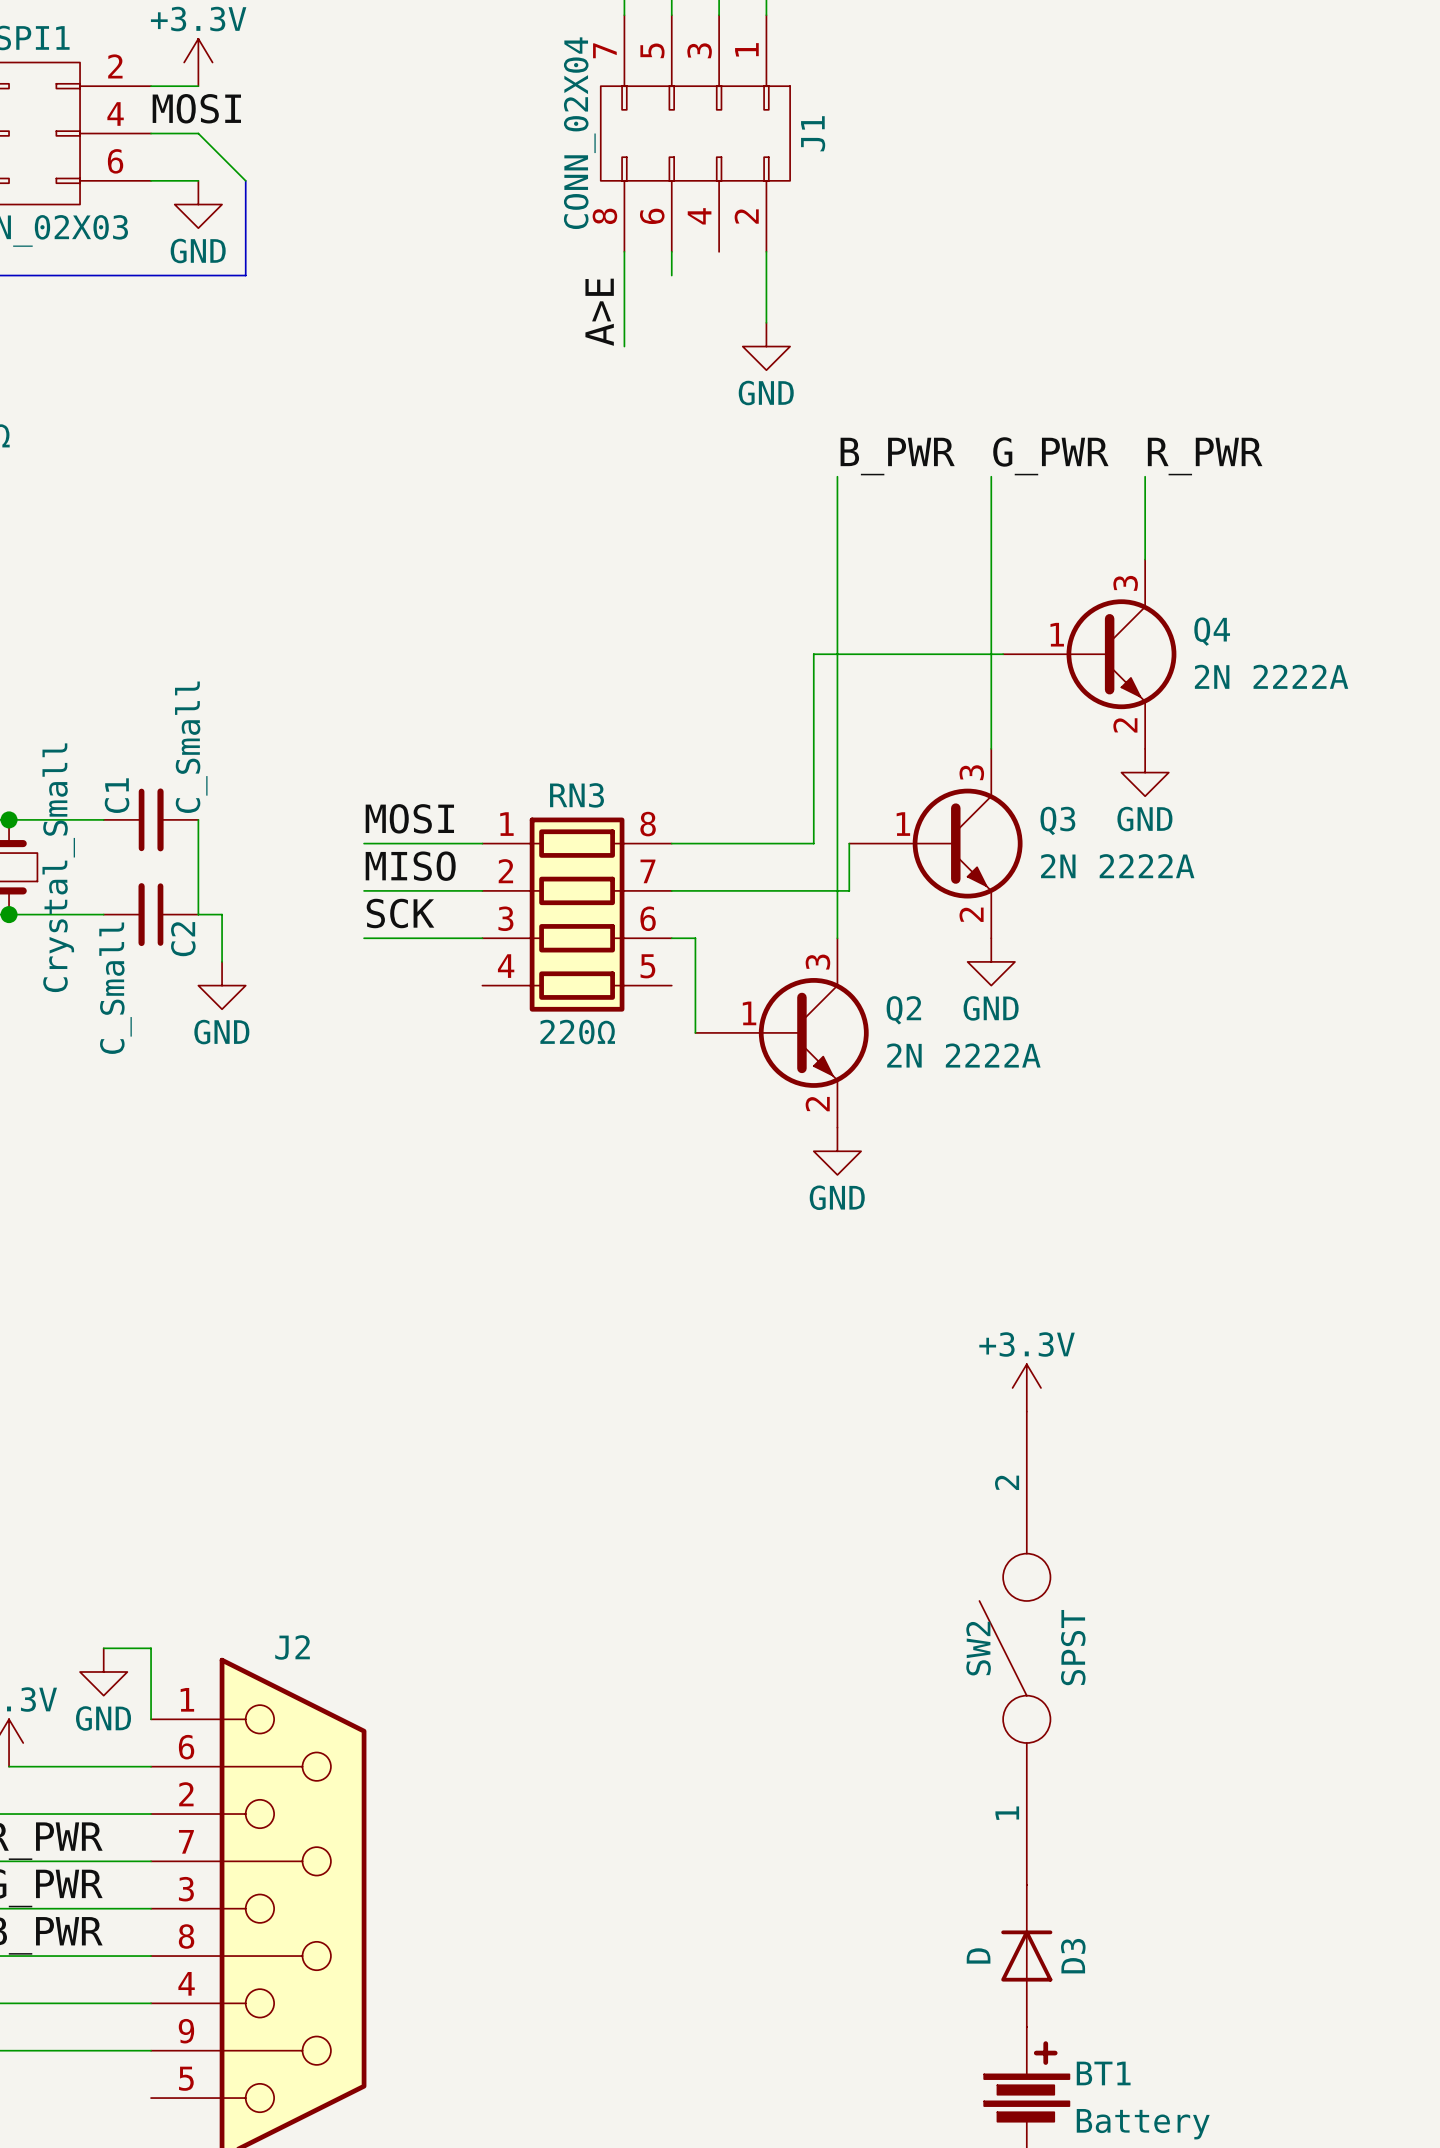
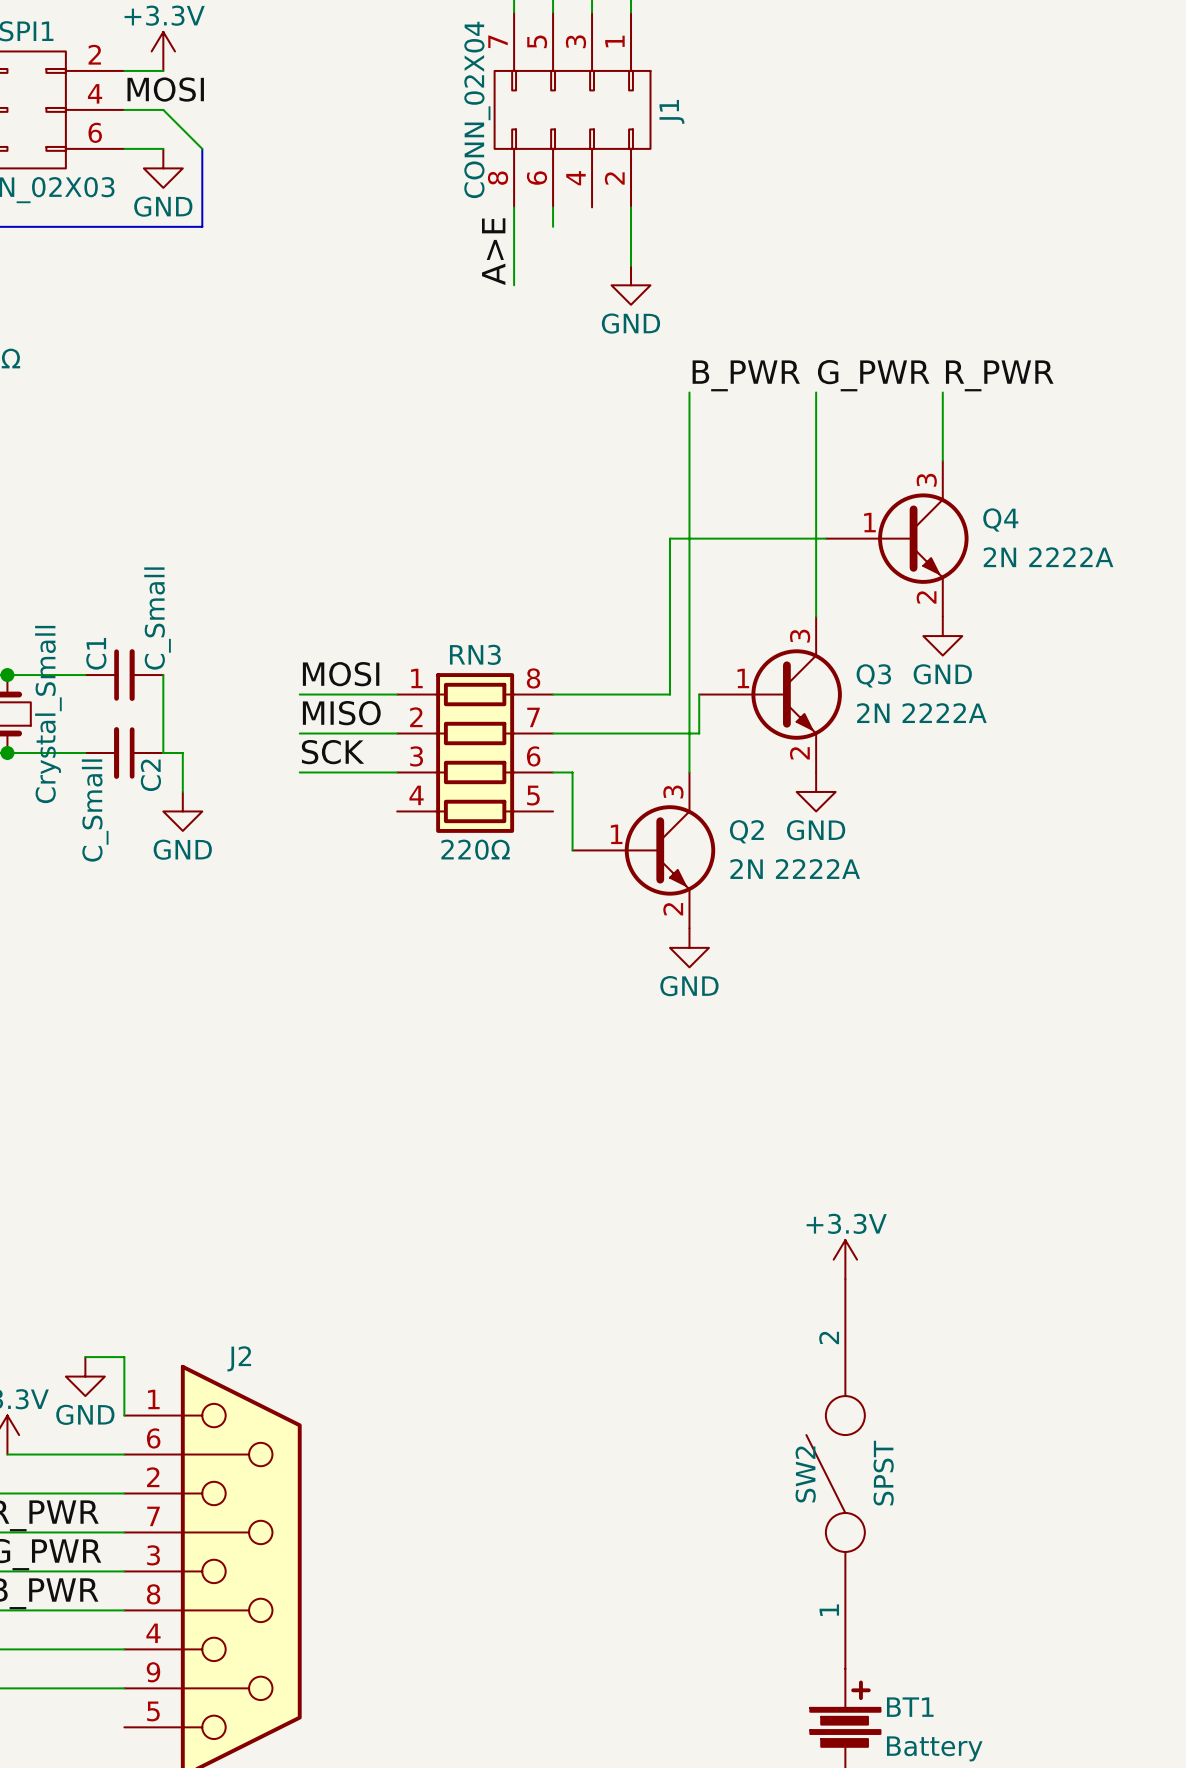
power symbol position: +3.3V (1026, 1387) -> +3.3V (845, 1259)
SW2 position: (1014, 1648) -> (835, 1474)
D3: D (1026, 1956) -> none

